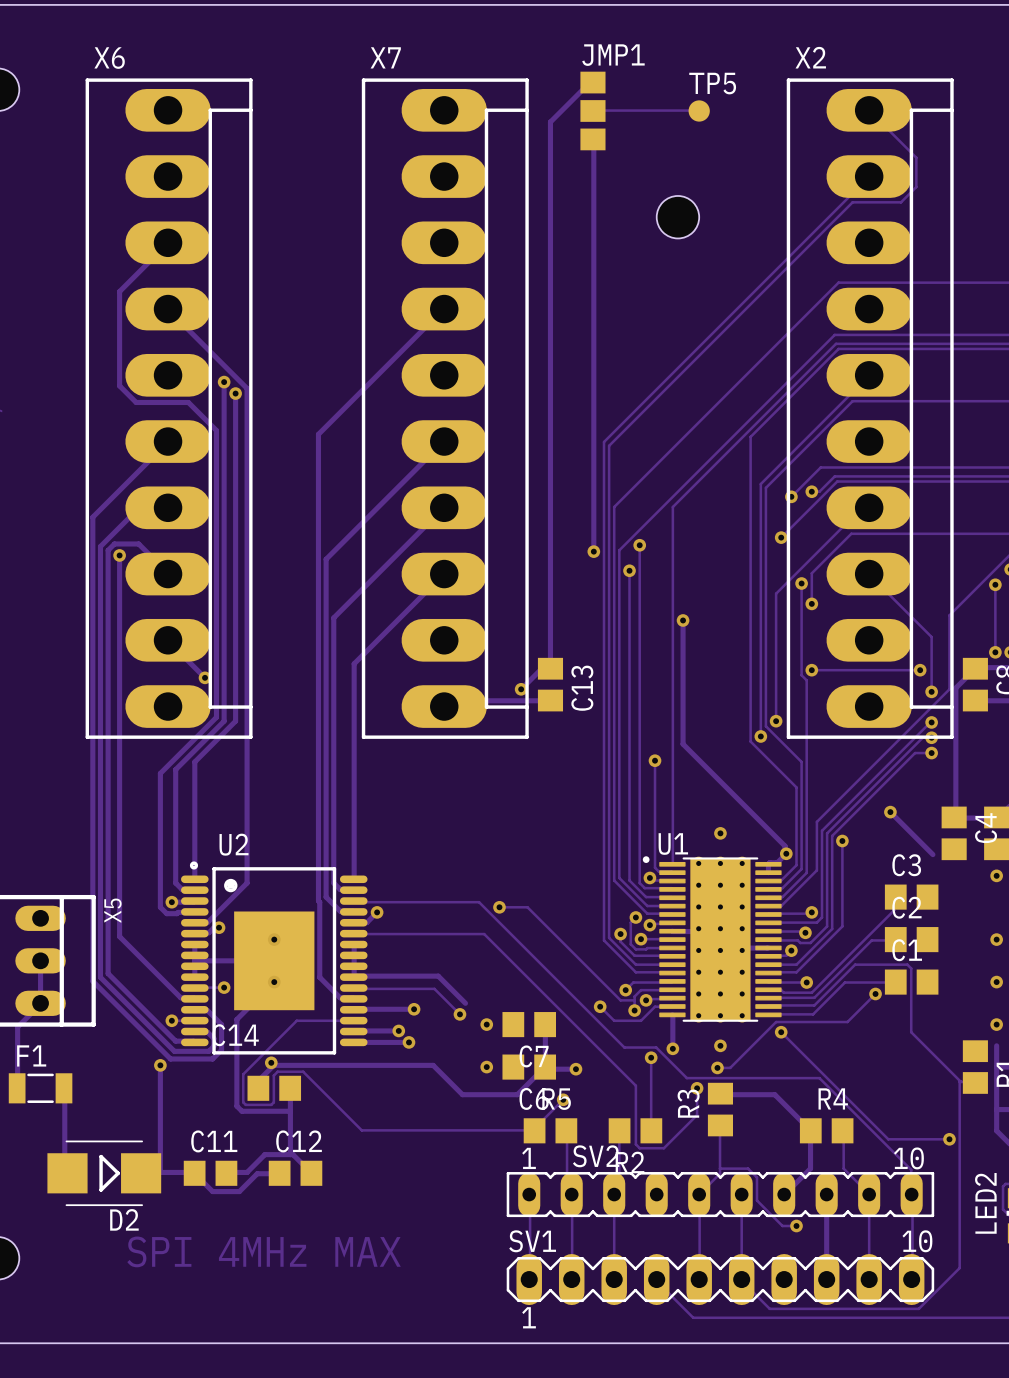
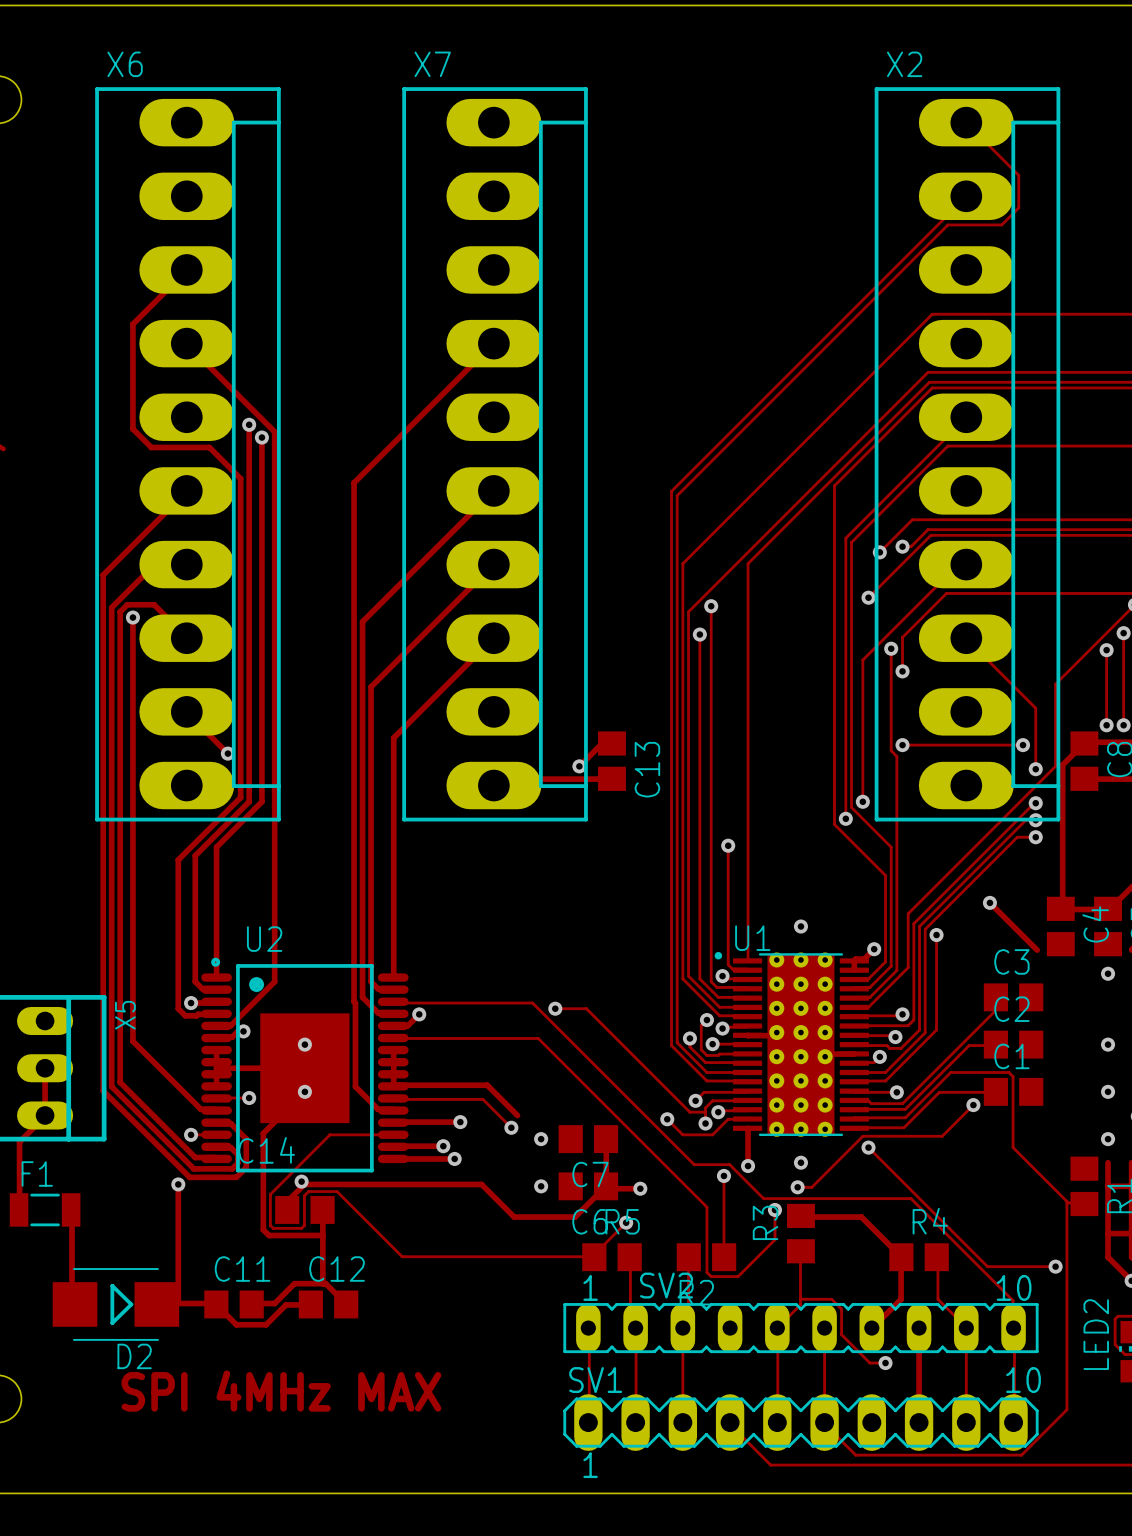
track: (592, 82) (588, 83) (550, 122) (550, 668) -> none
track: (592, 110) (699, 110) -> none
JMP1: (592, 110) -> none
TP5: (699, 110) -> none
track: (592, 139) (593, 551) -> none
hole: (677, 217) -> none
via: (593, 551) -> none
track: (683, 620) (683, 744) (785, 846) (786, 853) -> none
via: (683, 620) -> none

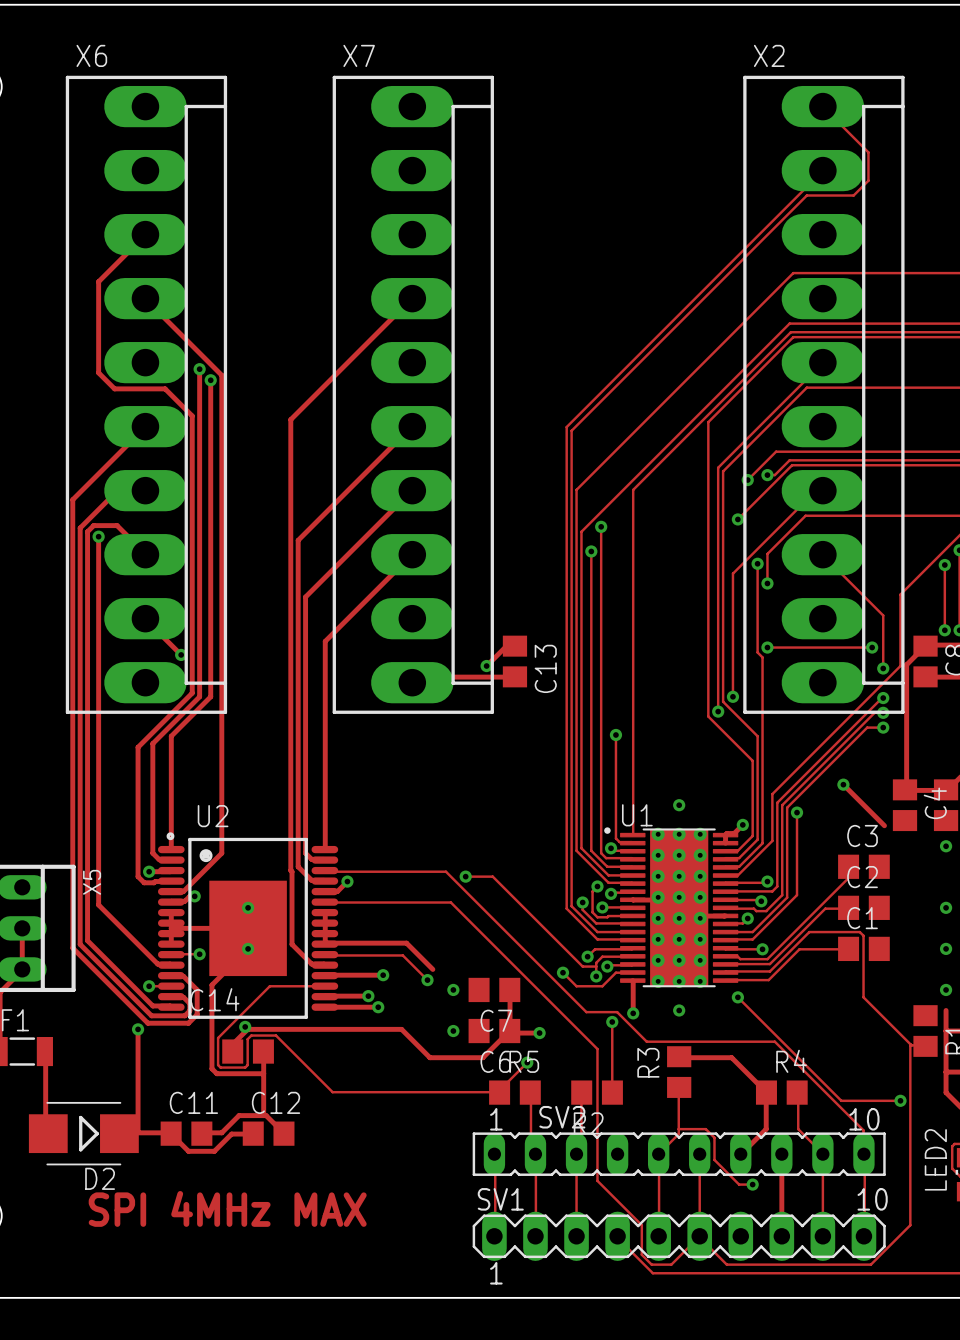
track: (973, 1105) (942, 1136) (862, 1136) (811, 1187) (797, 1187) -> none
via: (973, 1105) -> none
via: (797, 1187) -> none
track: (774, 1209) (774, 1239) (738, 1276) (711, 1276) (706, 1272) -> (699, 1236) (671, 1264) (651, 1264) (641, 1254) (641, 1225) (597, 1180) (597, 1105)
via: (774, 1209) -> none

